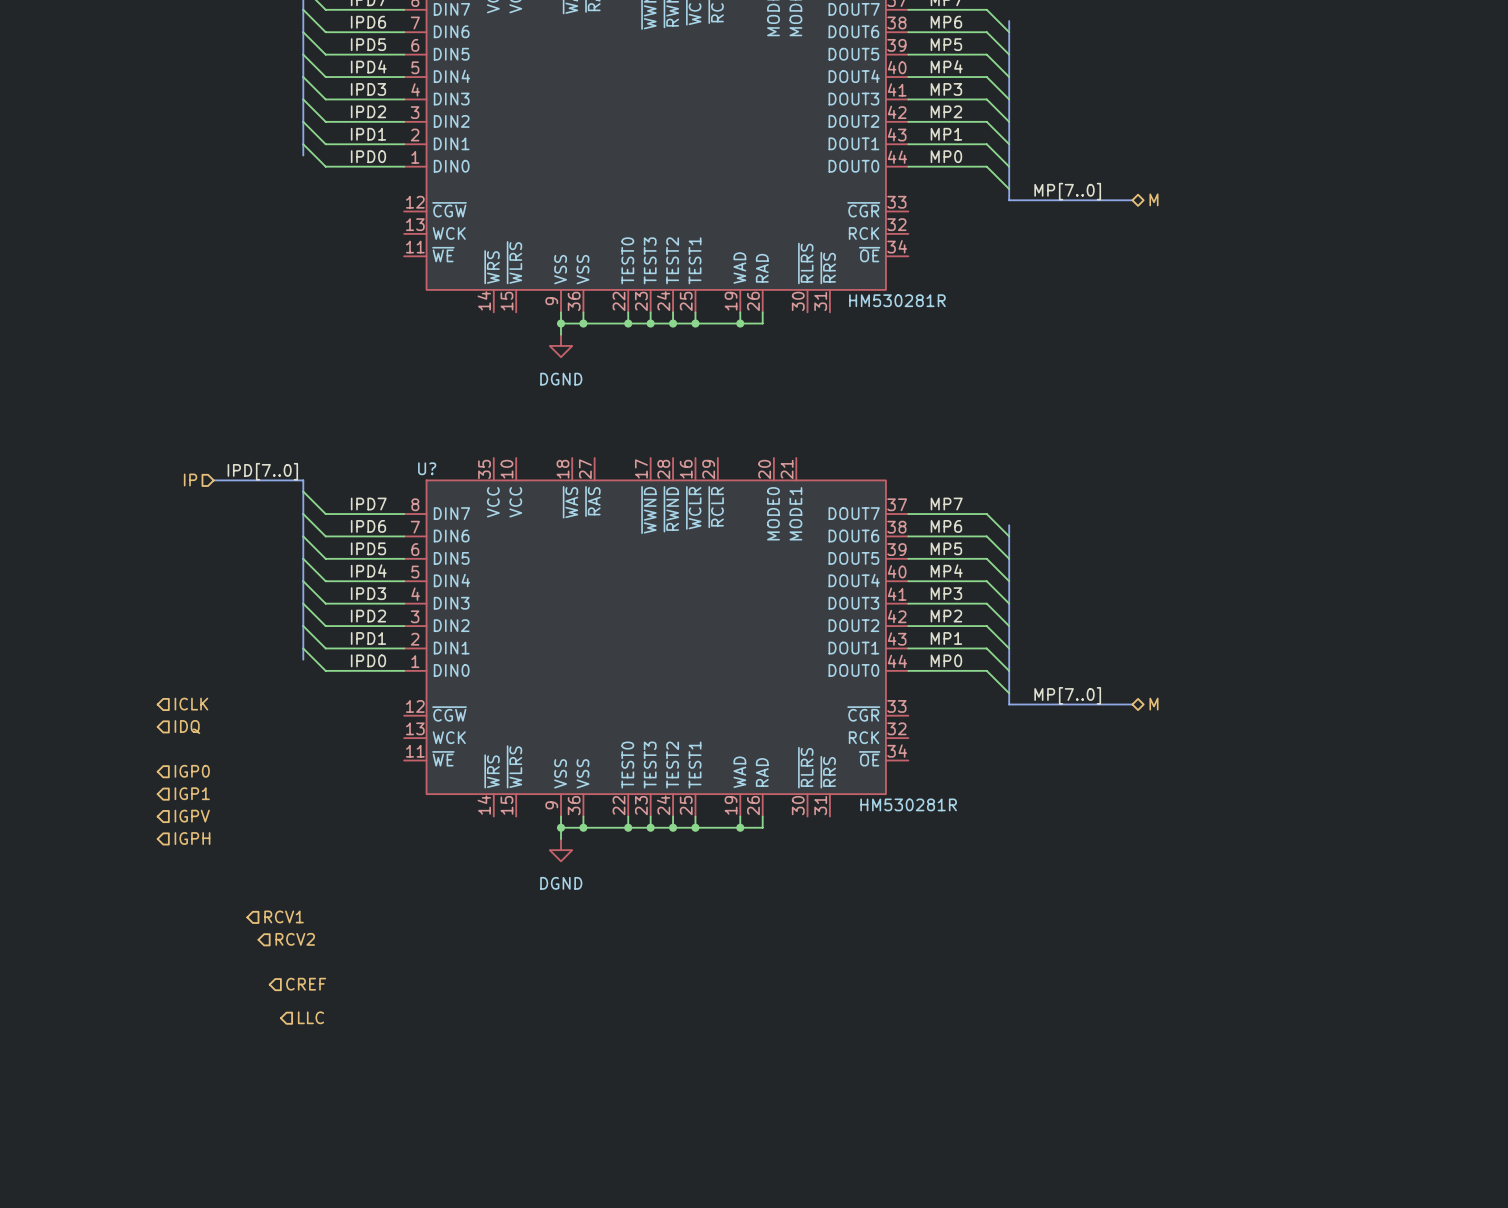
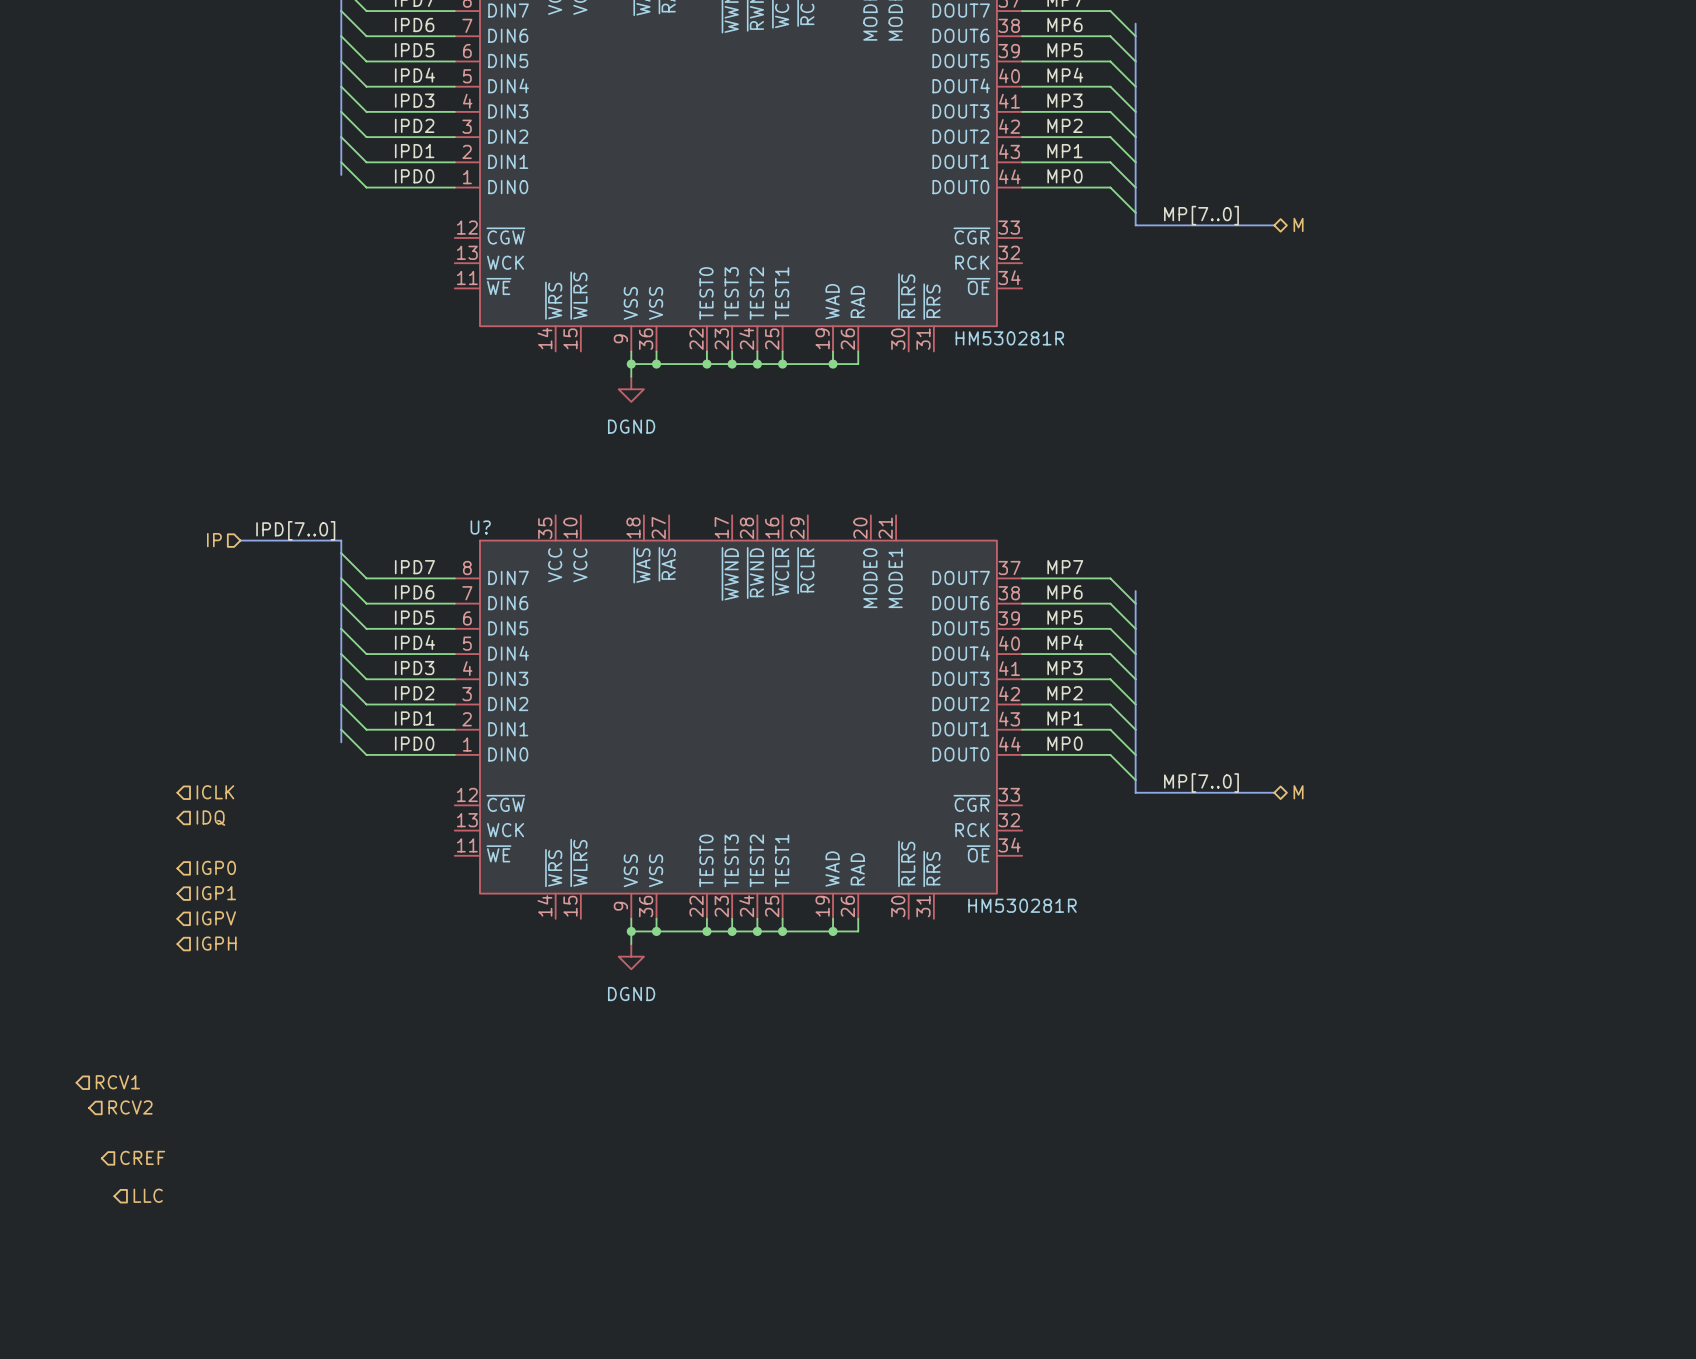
hierarchical label position: RCV1 (284, 916) -> RCV1 (117, 1082)
hierarchical label position: RCV2 (295, 939) -> RCV2 (130, 1107)
hierarchical label position: CREF (306, 984) -> CREF (142, 1157)
hierarchical label position: LLC (310, 1017) -> LLC (148, 1195)

